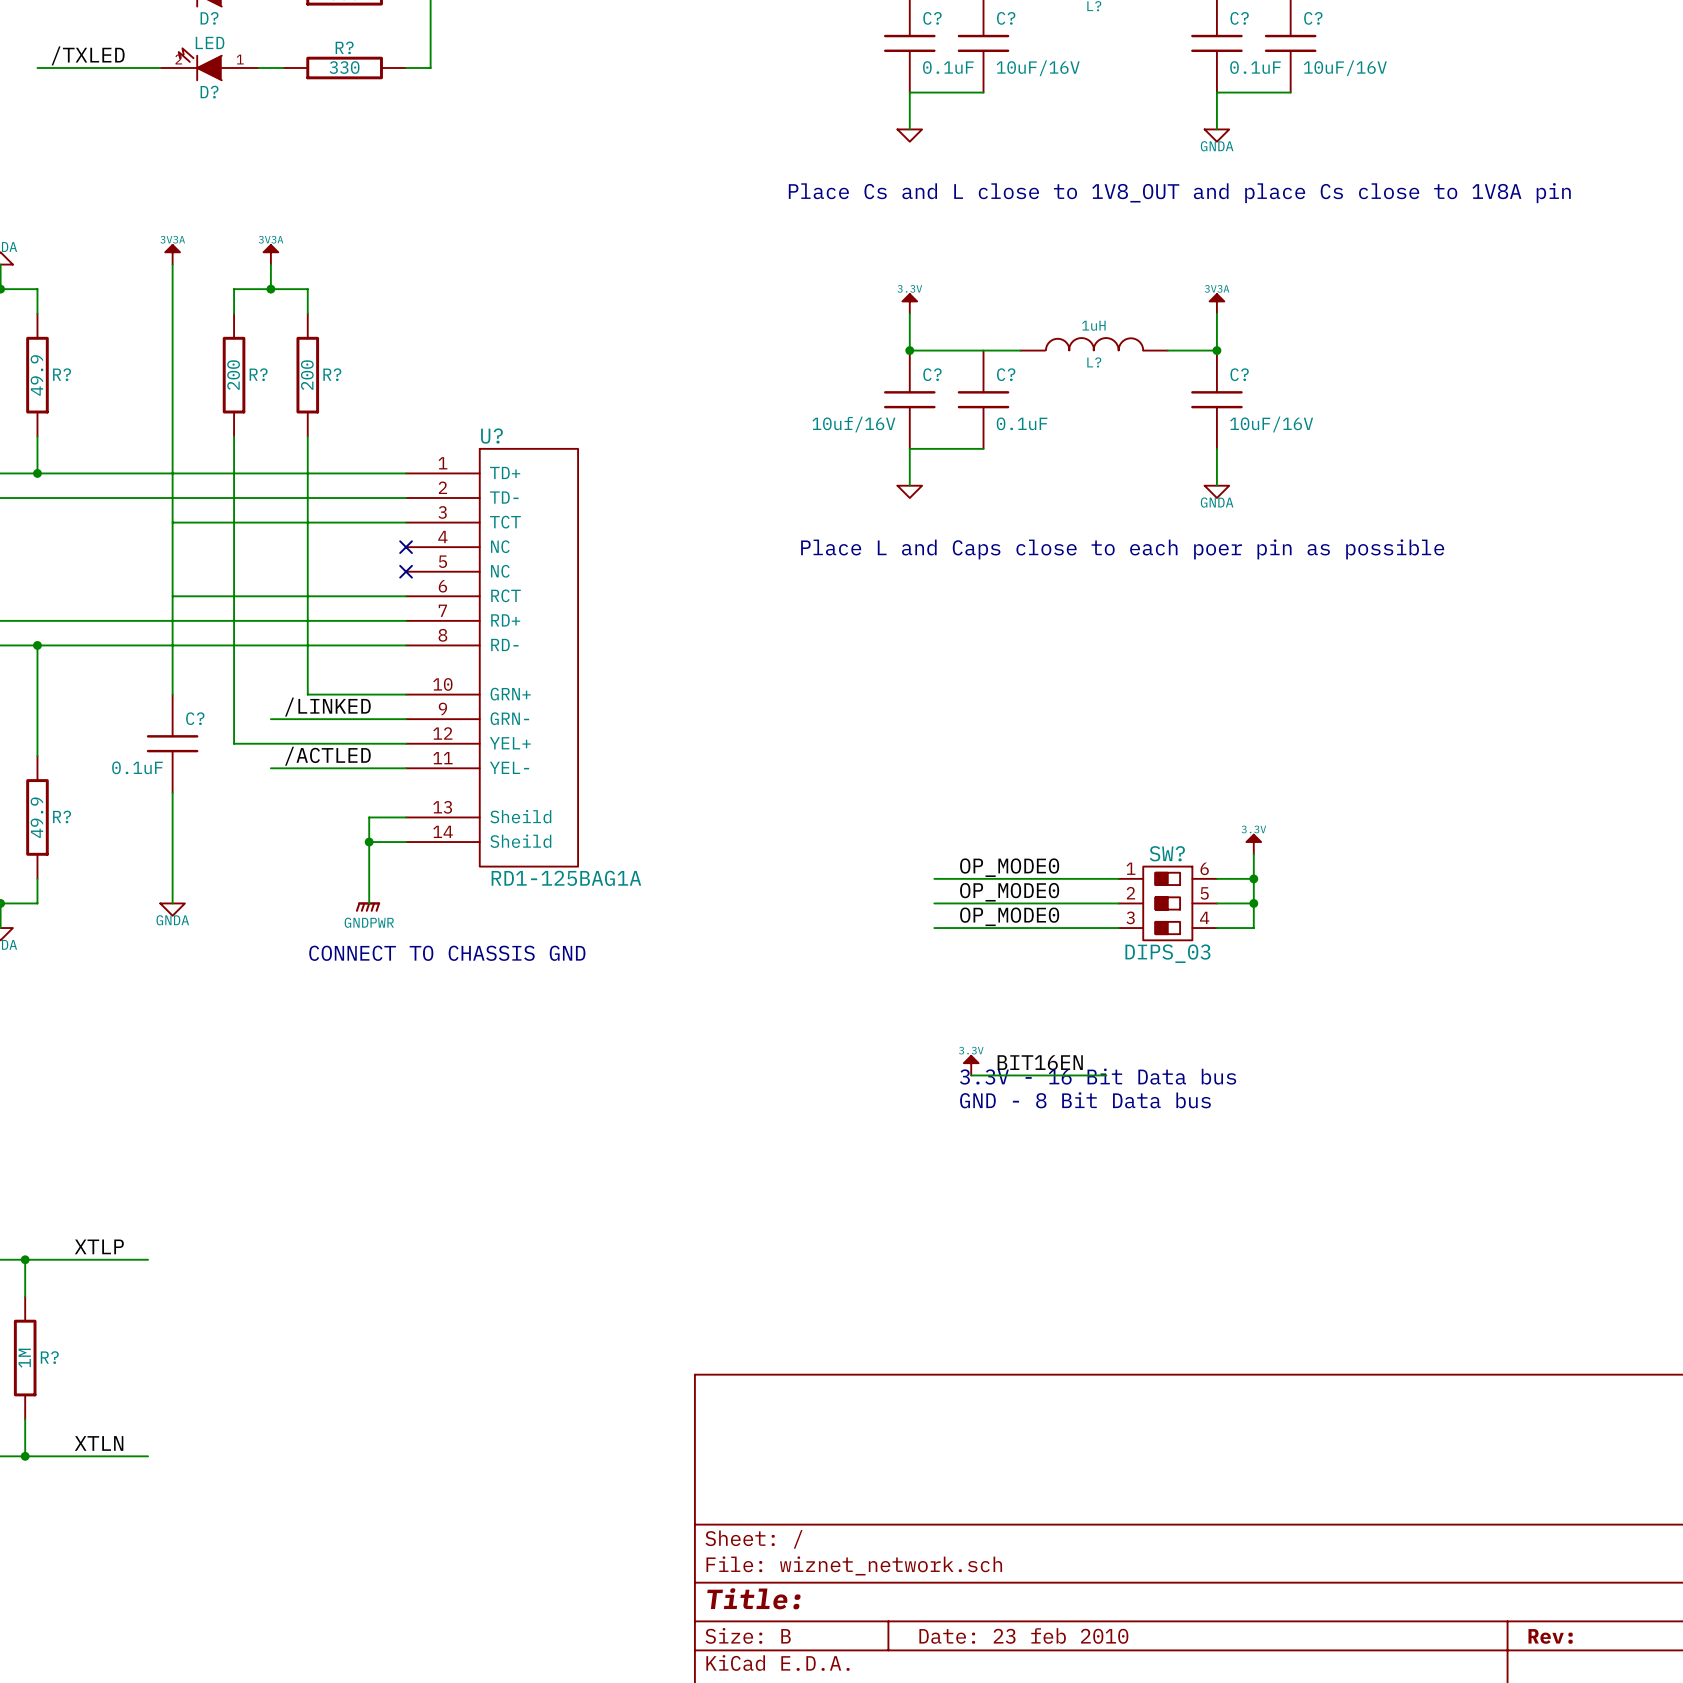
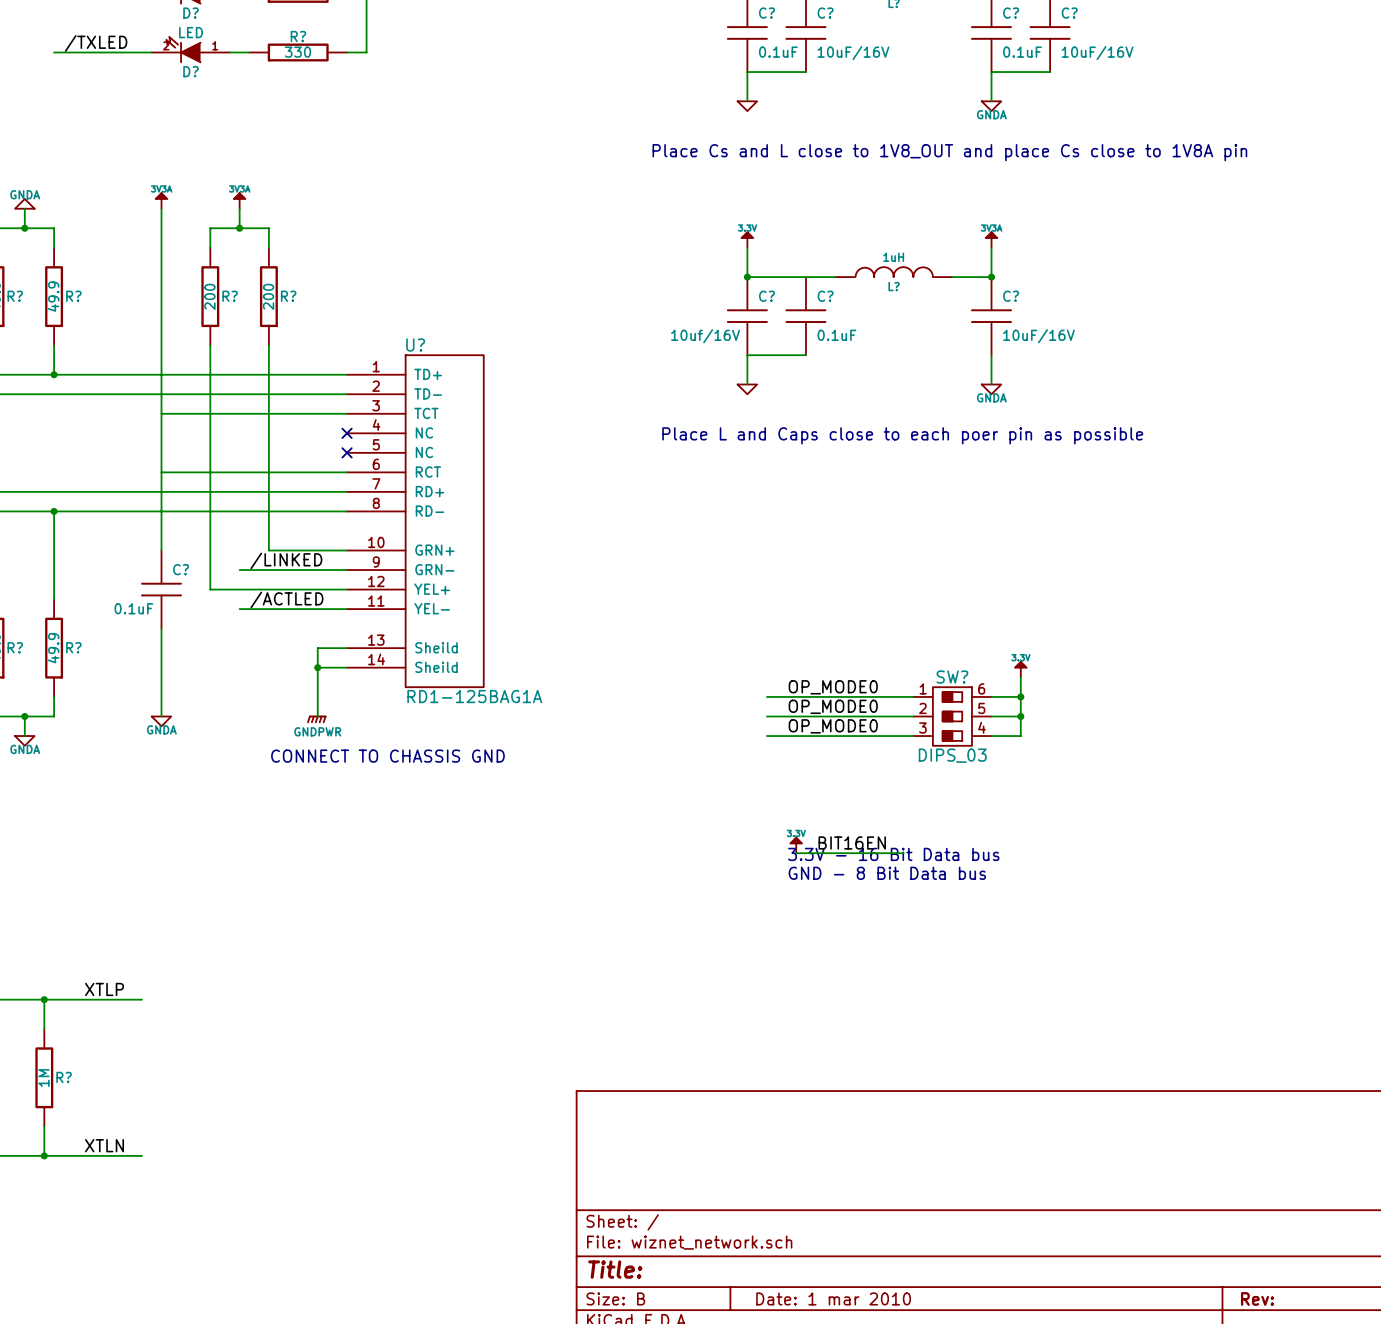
title block: Date: 23 feb 2010 (1023, 1635) -> Date: 1 mar 2010 (833, 1298)

